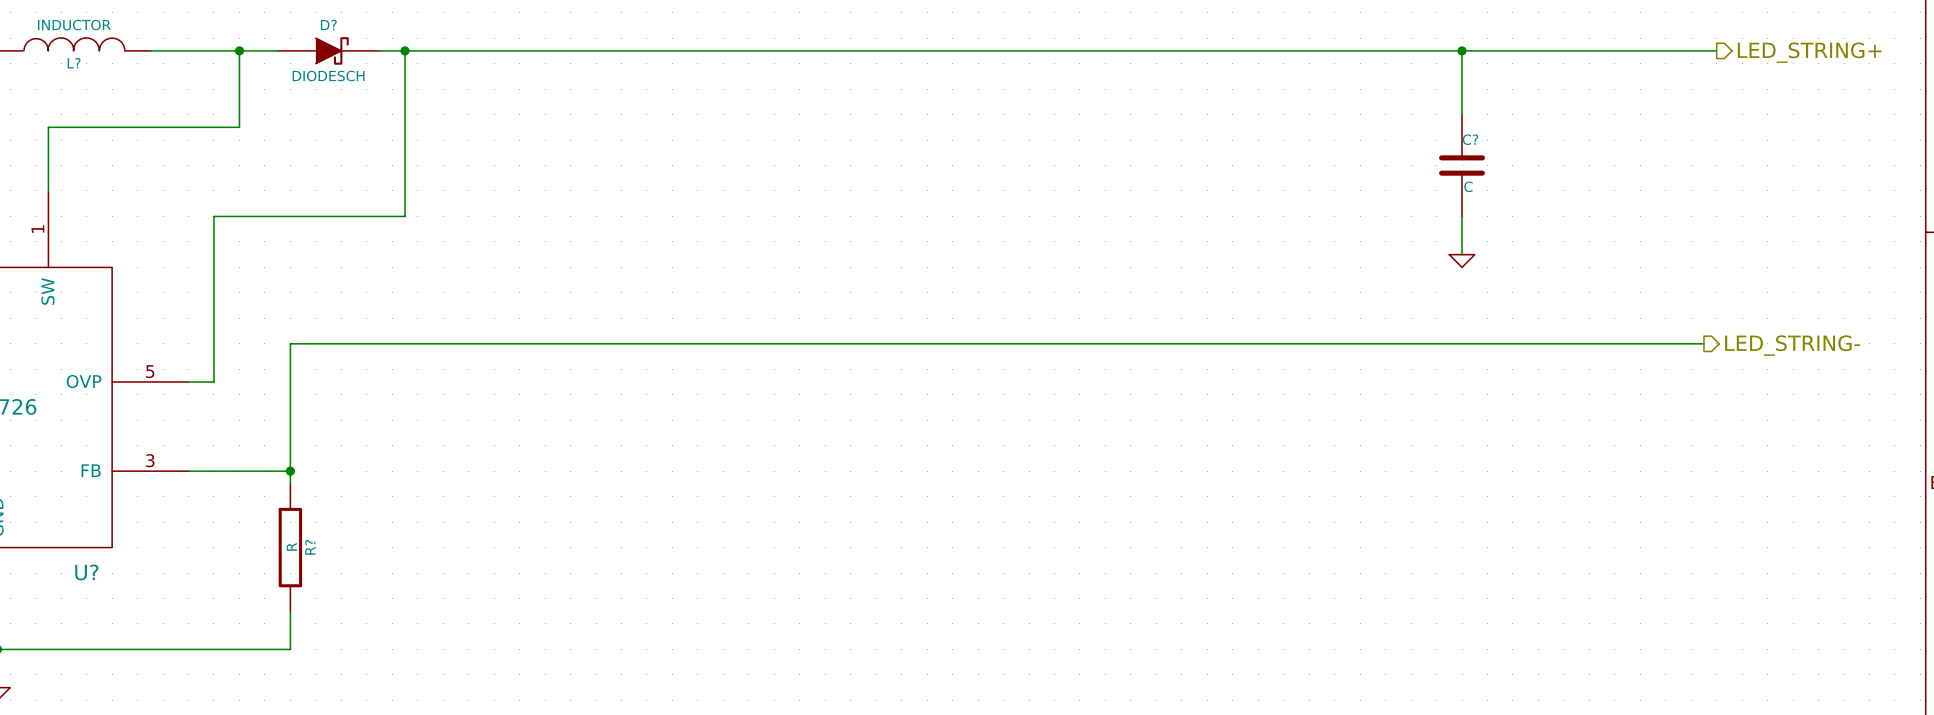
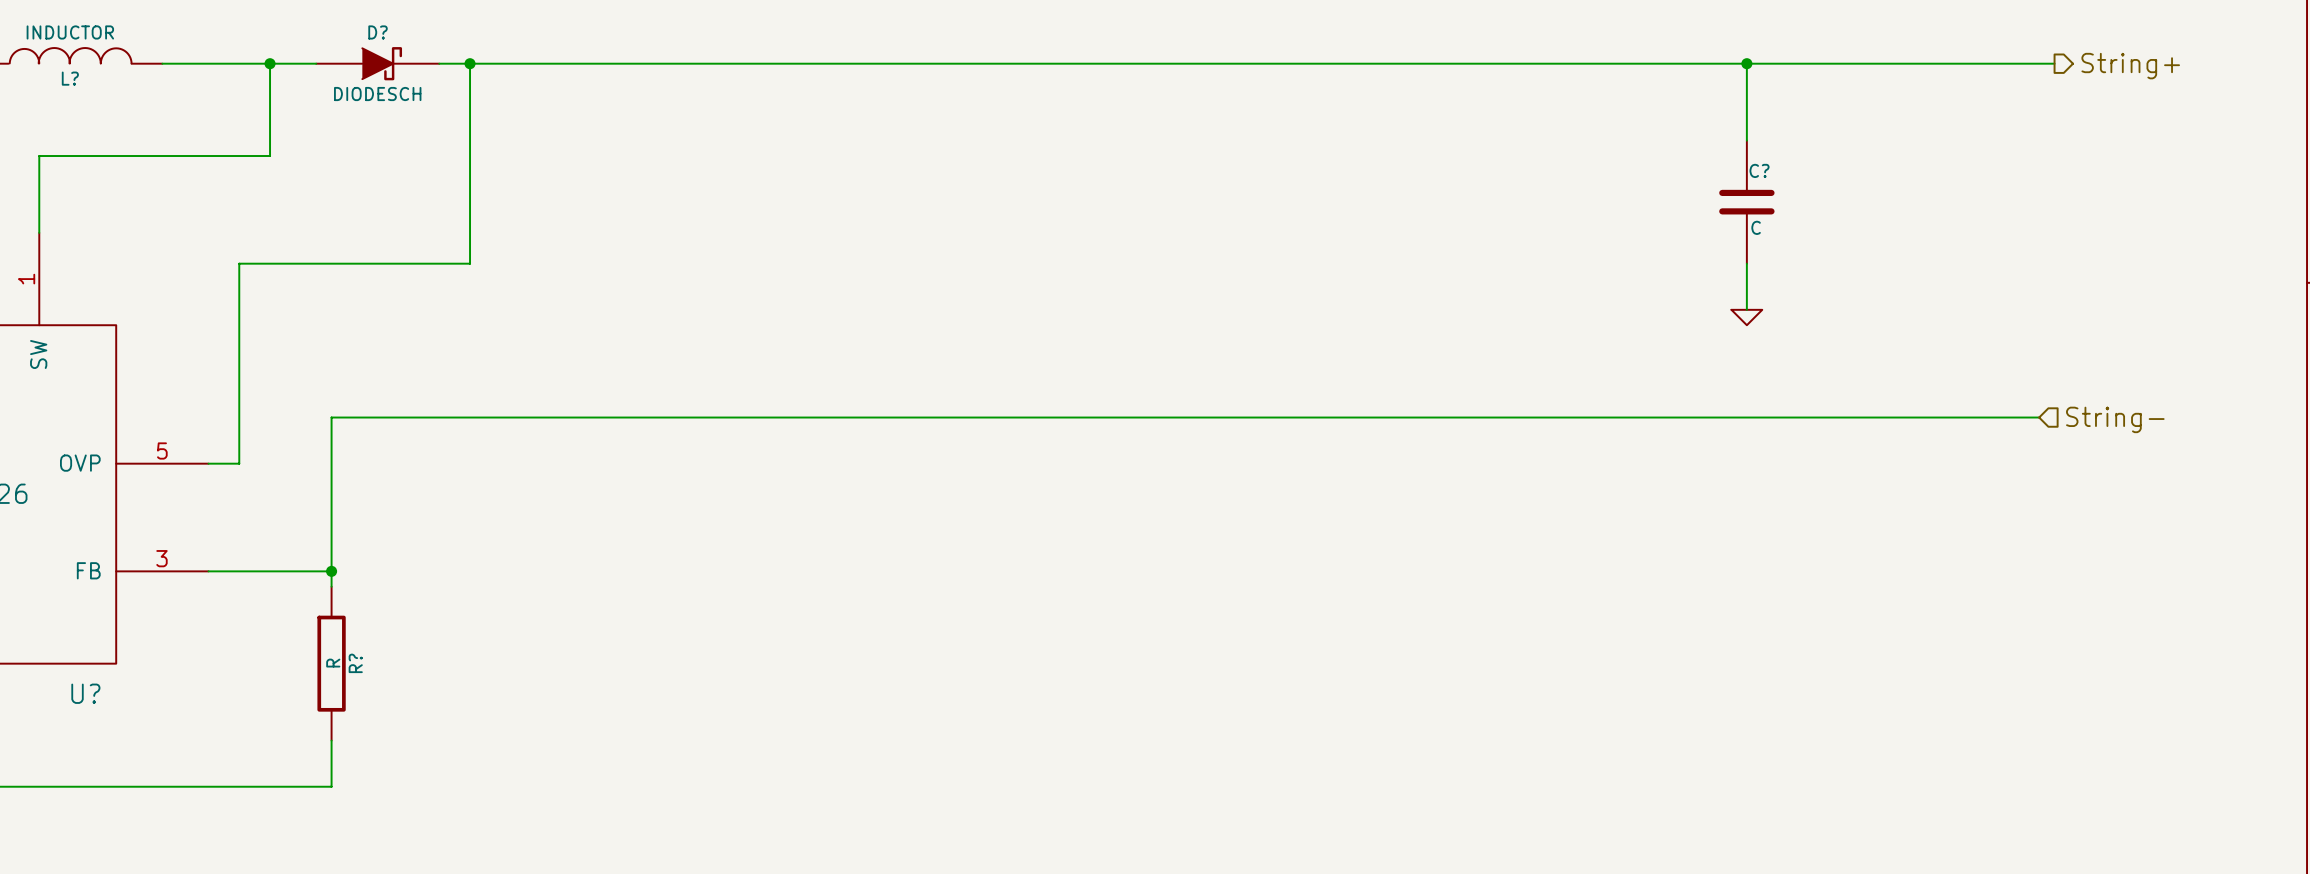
hierarchical label: LED_STRING+ (1809, 52) -> String+ (2130, 66)
hierarchical label shape: output (1792, 345) -> input (2115, 419)
hierarchical label: LED_STRING- (1792, 345) -> String- (2115, 419)

